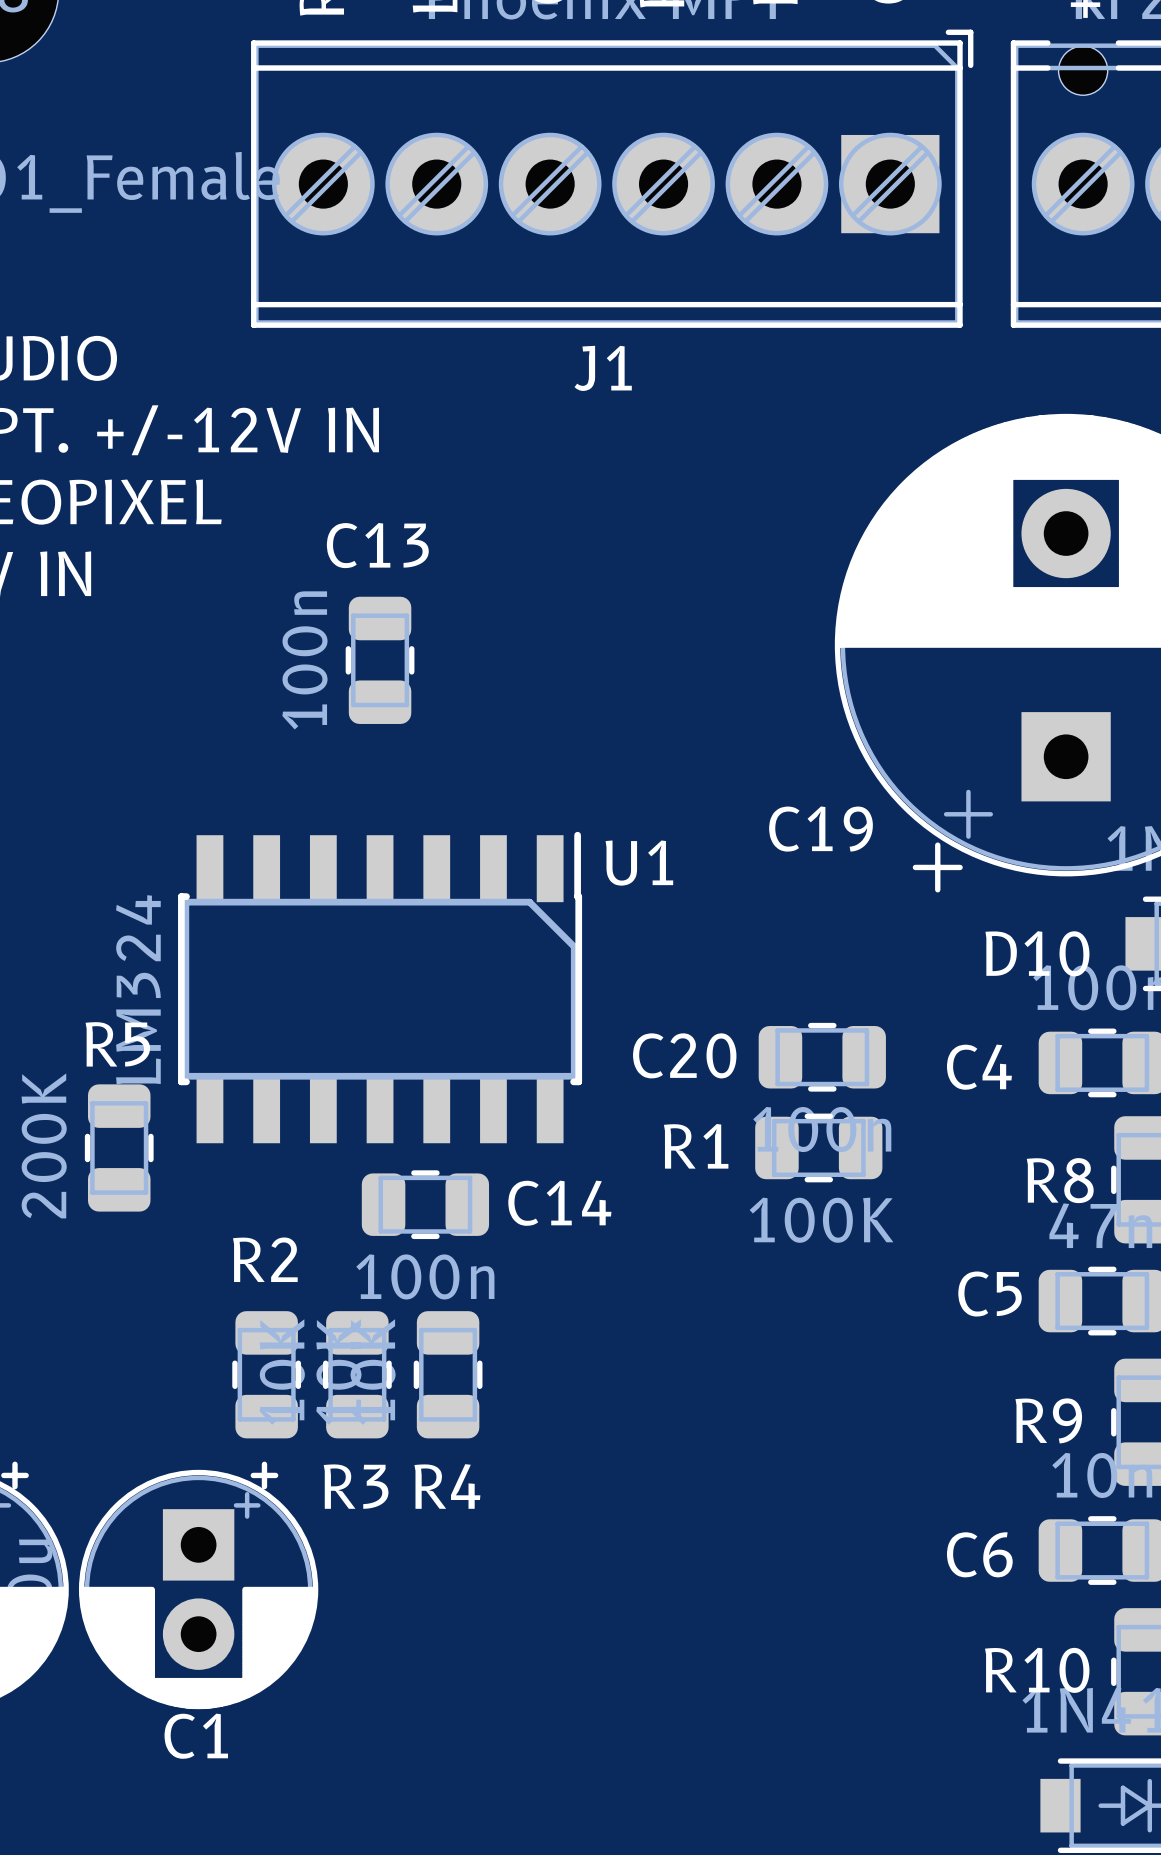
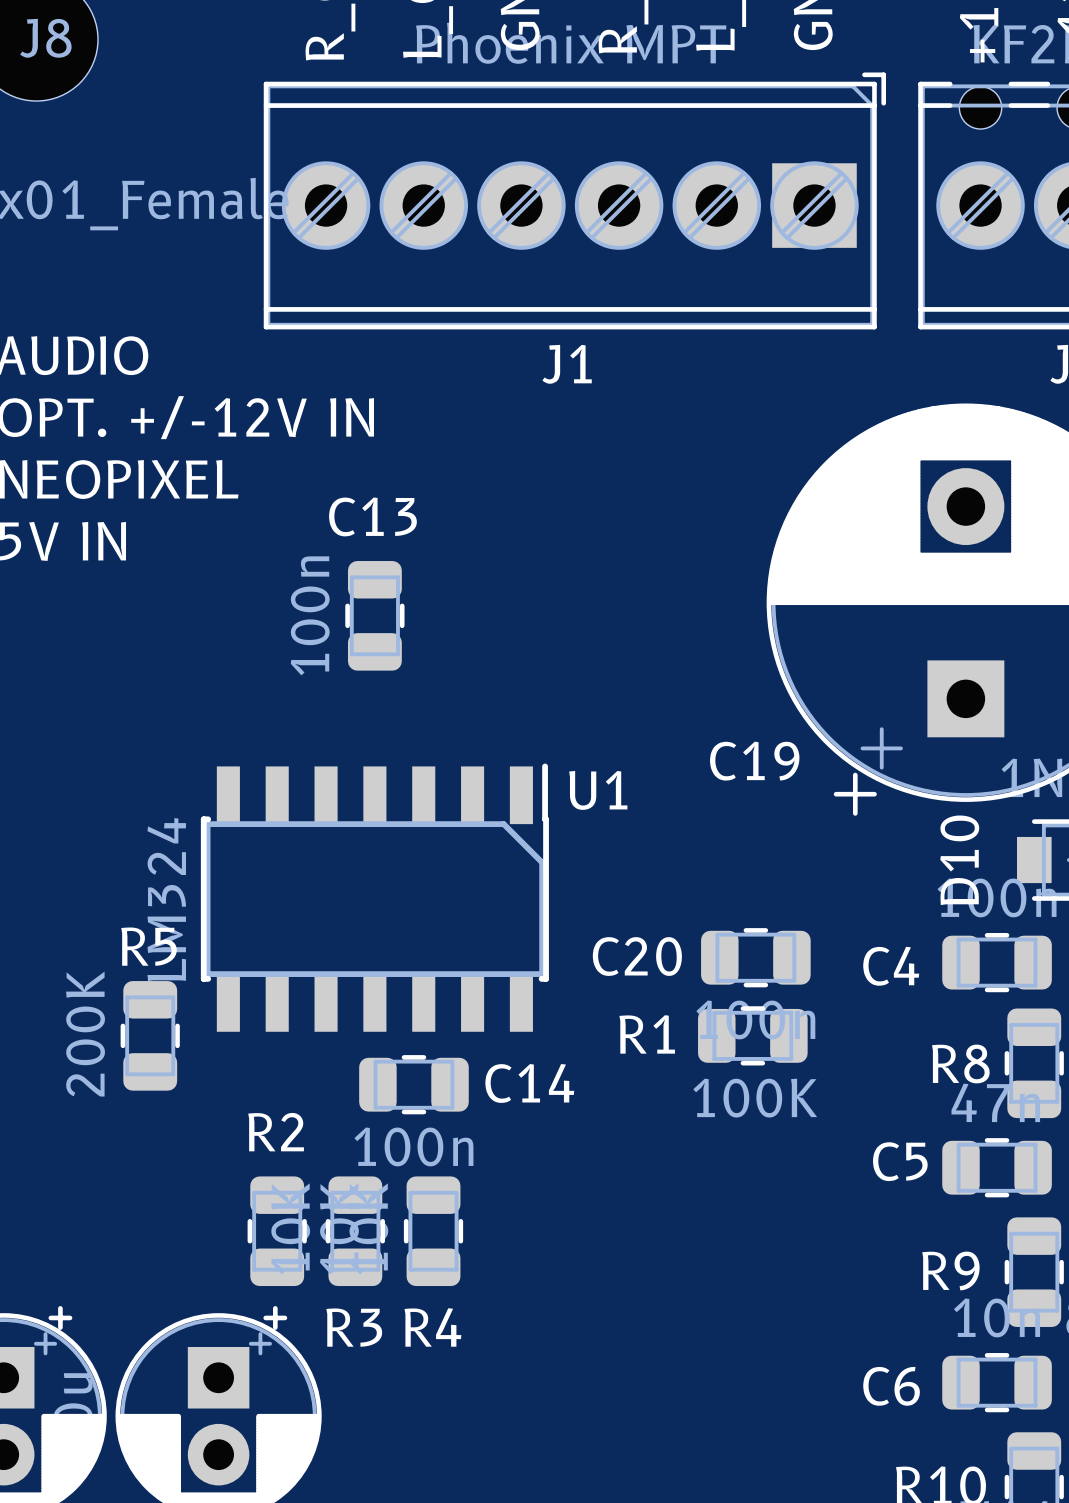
D10 name rotation: 0° (1037, 953) -> 90° counterclockwise (959, 860)

